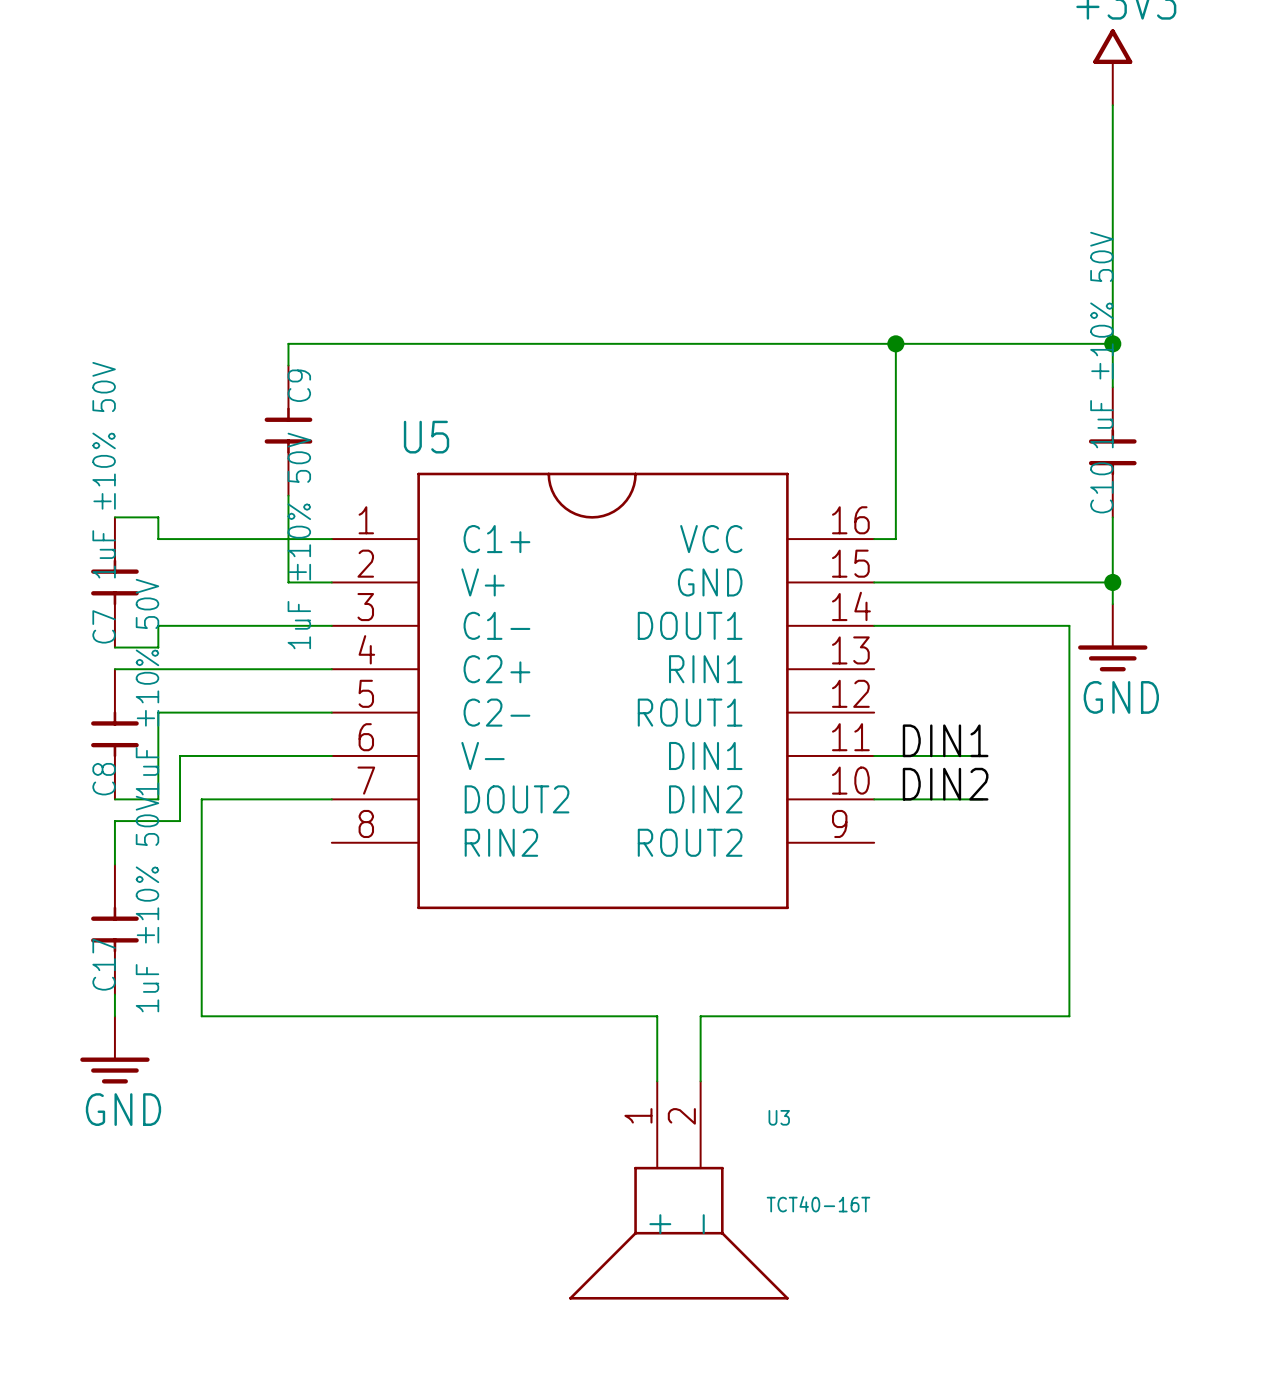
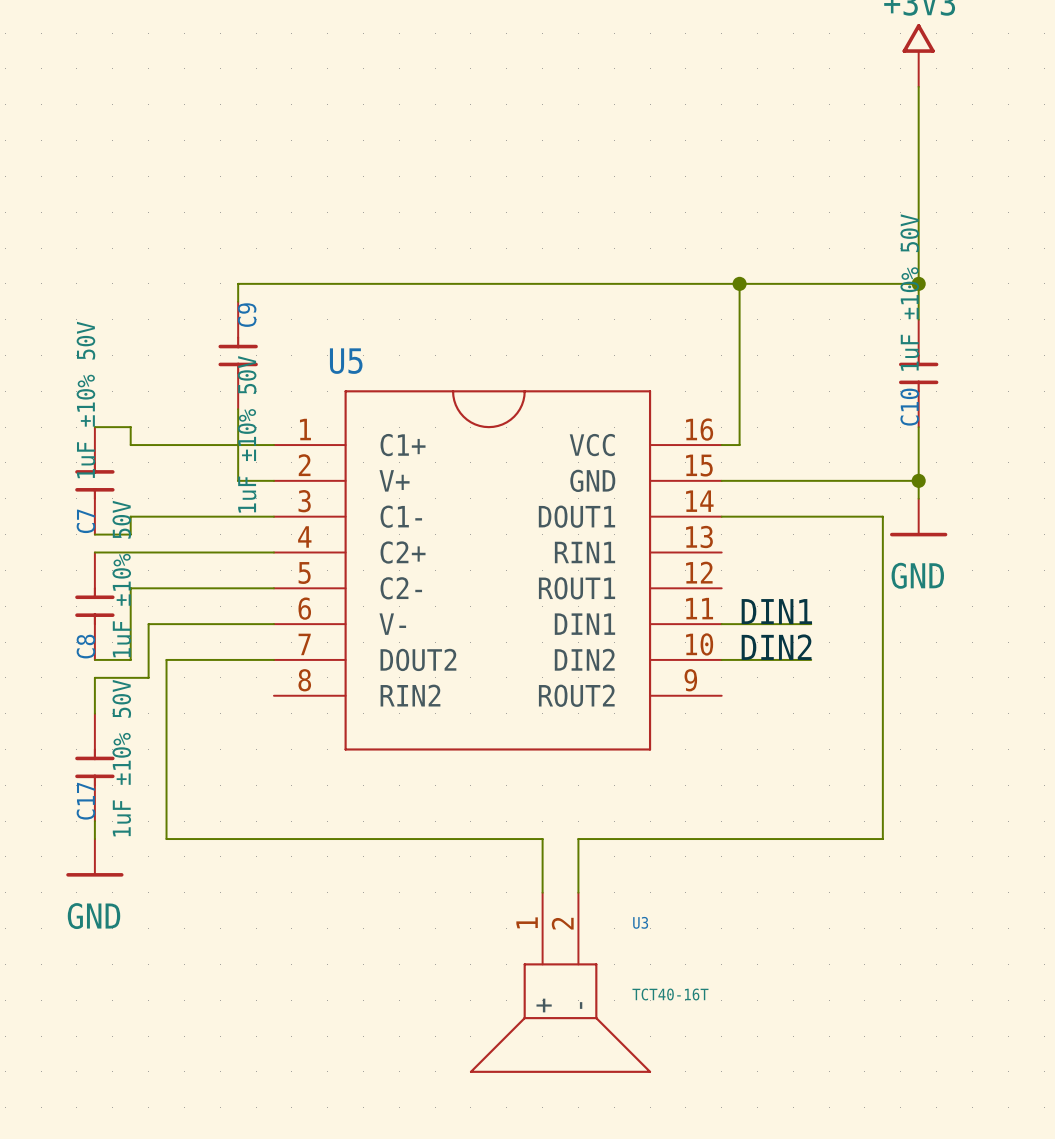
power symbol shape: [1078, 604, 1148, 672] -> [890, 498, 948, 537]
power symbol shape: [80, 1016, 150, 1084] -> [66, 839, 124, 877]

